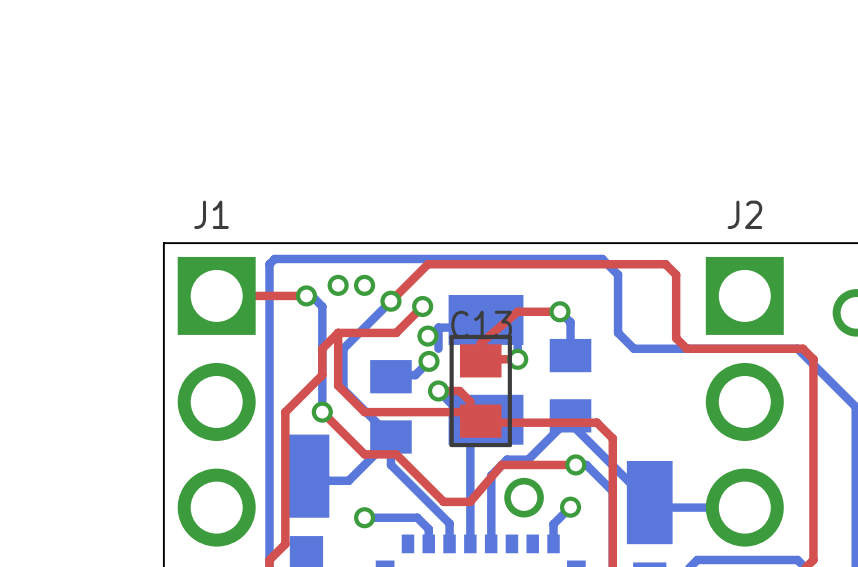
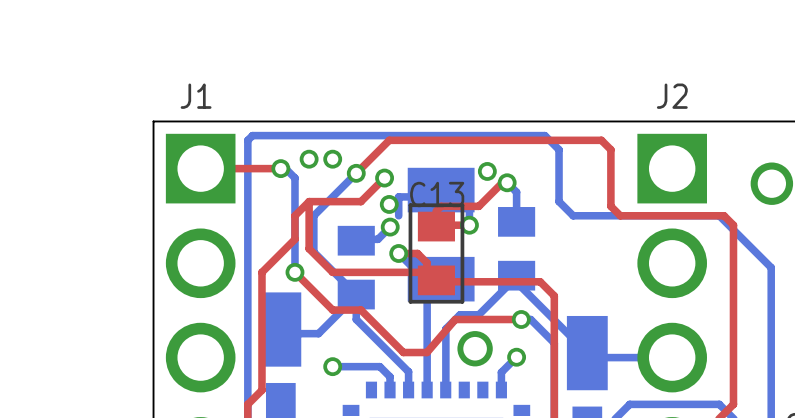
via: none -> (487, 171)
top track: (554, 311) (517, 311) (480, 343) -> (502, 182) (478, 206) (441, 206) (436, 211)

